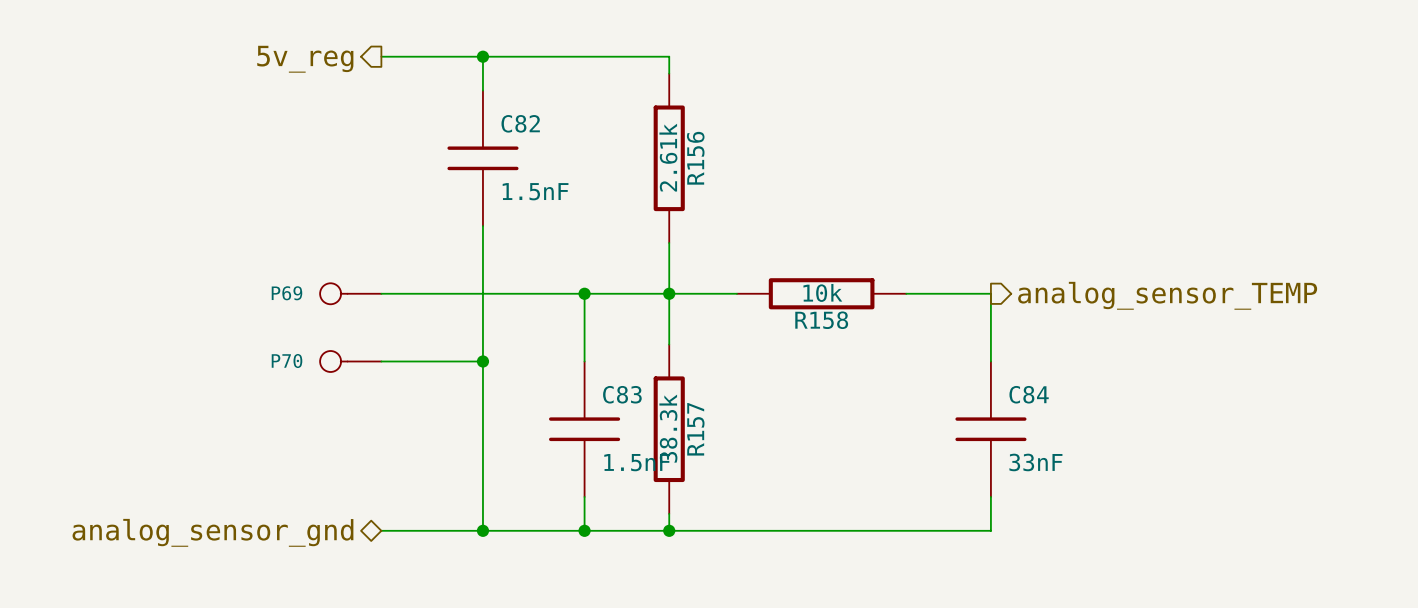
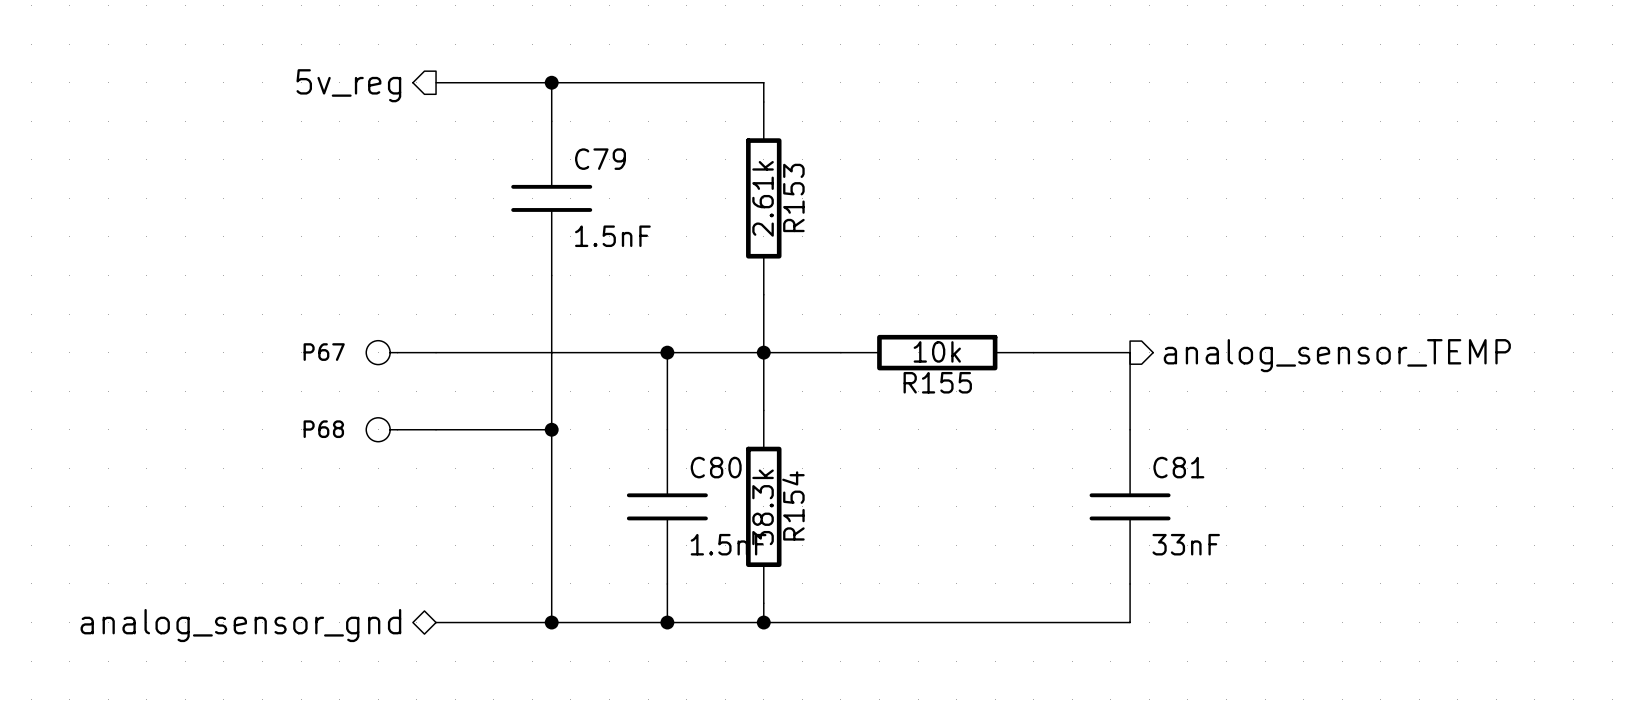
C82 name: C82 (520, 123) -> C79 (600, 159)
R156 name: R156 (695, 158) -> R153 (793, 197)
P69 name: P69 (286, 293) -> P67 (324, 352)
R158 name: R158 (821, 320) -> R155 (937, 382)
P70 name: P70 (287, 361) -> P68 (323, 429)
C83 name: C83 (622, 394) -> C80 (716, 467)
C84 name: C84 (1029, 394) -> C81 (1178, 467)
R157 name: R157 (695, 429) -> R154 (793, 505)

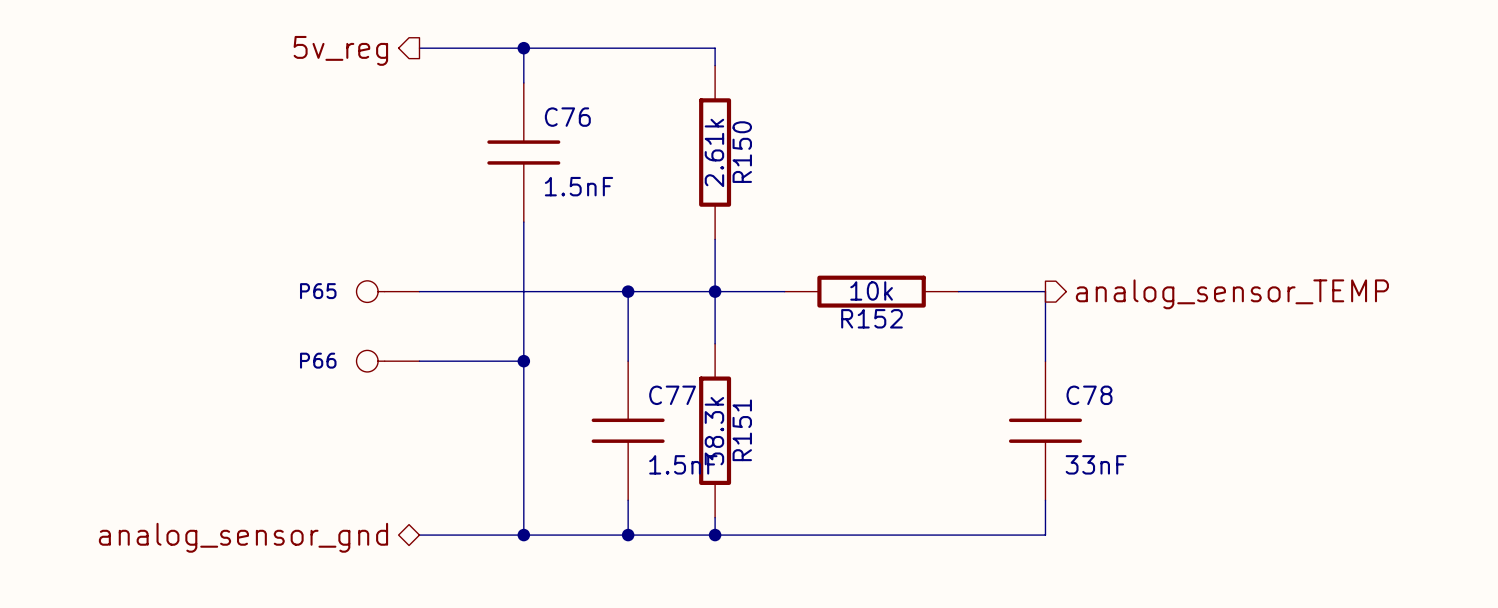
C79 name: C79 (600, 159) -> C76 (567, 117)
R153 name: R153 (793, 197) -> R150 (742, 152)
P67 name: P67 (324, 352) -> P65 (318, 291)
R155 name: R155 (937, 382) -> R152 (872, 318)
P68 name: P68 (323, 429) -> P66 (318, 360)
C80 name: C80 (716, 467) -> C77 (672, 395)
C81 name: C81 (1178, 467) -> C78 (1089, 395)
R154 name: R154 (793, 505) -> R151 (742, 430)

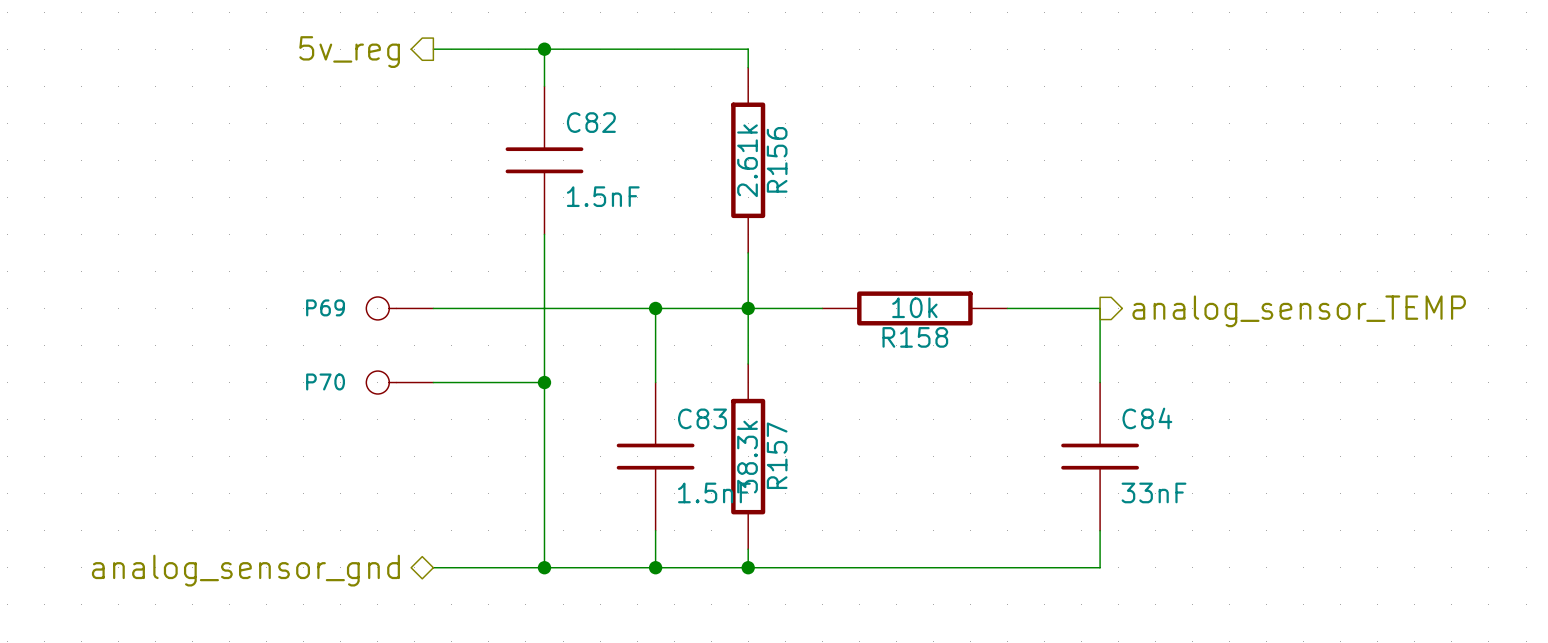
C76 name: C76 (567, 117) -> C82 (591, 122)
R150 name: R150 (742, 152) -> R156 (777, 159)
P65 name: P65 (318, 291) -> P69 (325, 307)
R152 name: R152 (872, 318) -> R158 (915, 337)
P66 name: P66 (318, 360) -> P70 (325, 381)
C77 name: C77 (672, 395) -> C83 (702, 418)
C78 name: C78 (1089, 395) -> C84 (1147, 418)
R151 name: R151 (742, 430) -> R157 (777, 455)

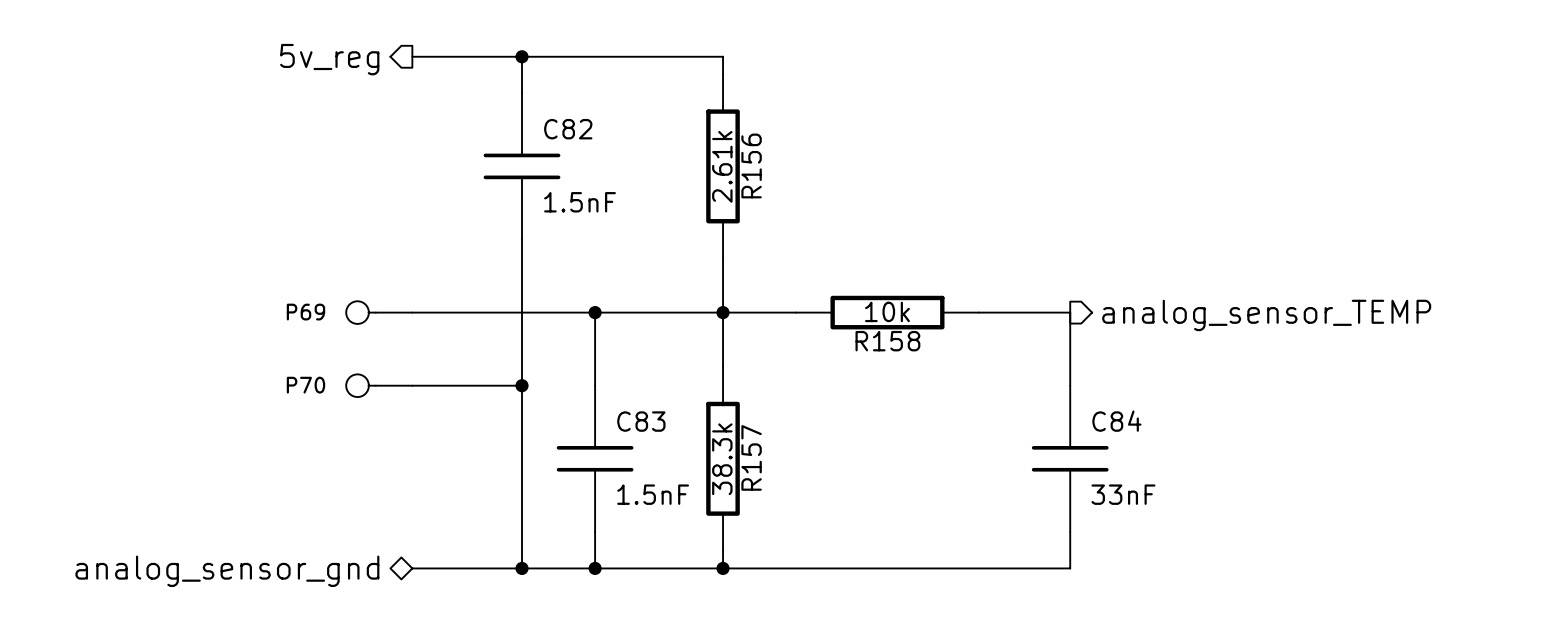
wire: (655, 308) (655, 382) -> (595, 312) (595, 385)
junction position: (655, 308) -> (595, 312)
C83 position: (655, 456) -> (595, 458)
wire: (655, 530) (655, 567) -> (595, 531) (595, 568)
junction position: (655, 567) -> (595, 568)

